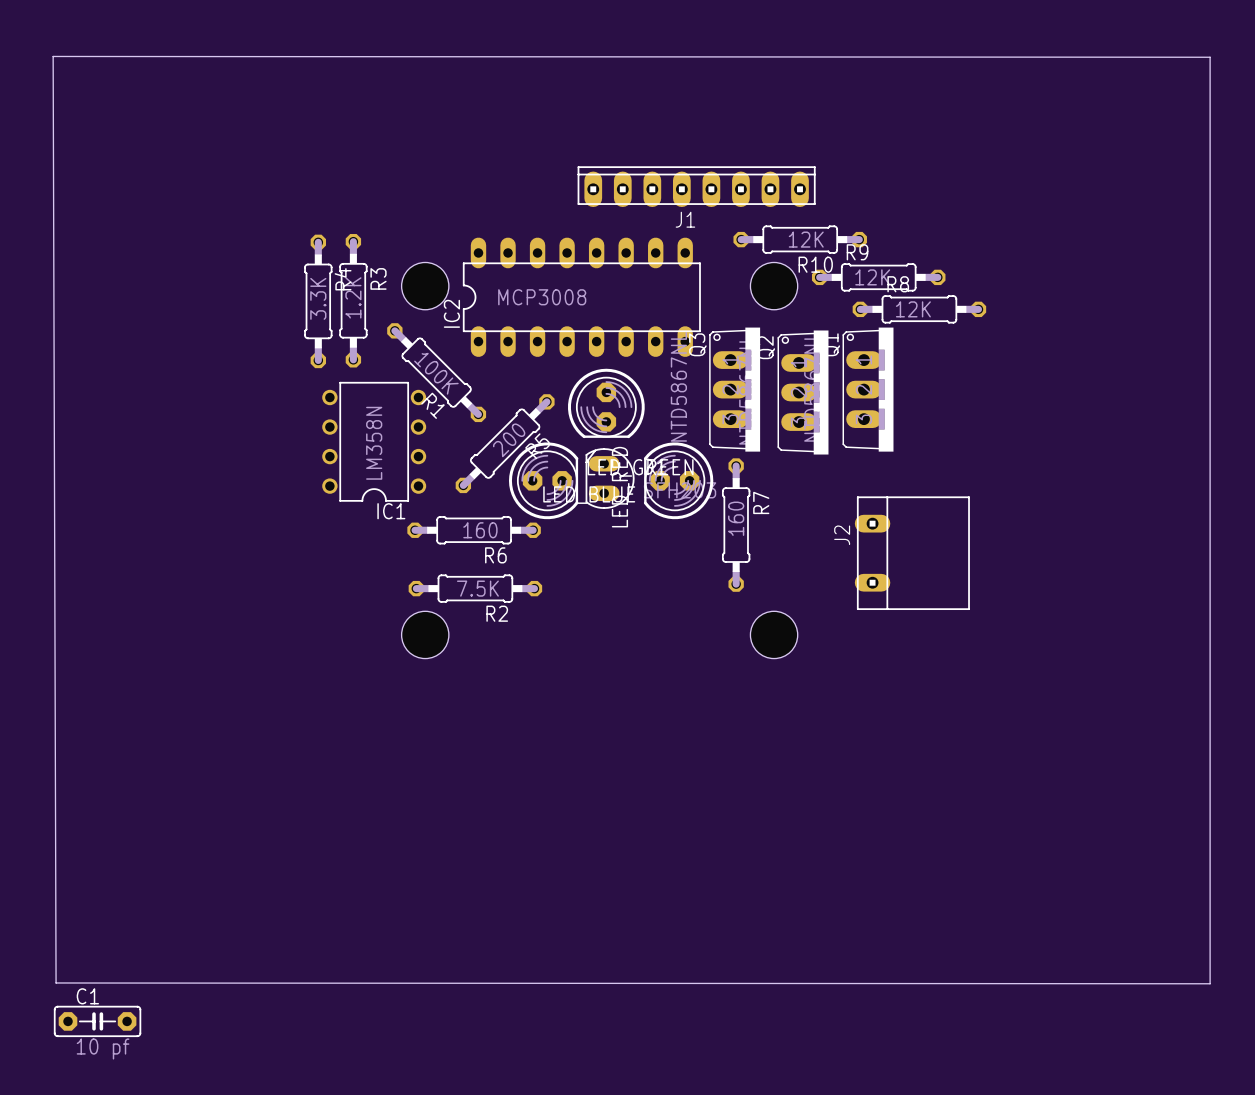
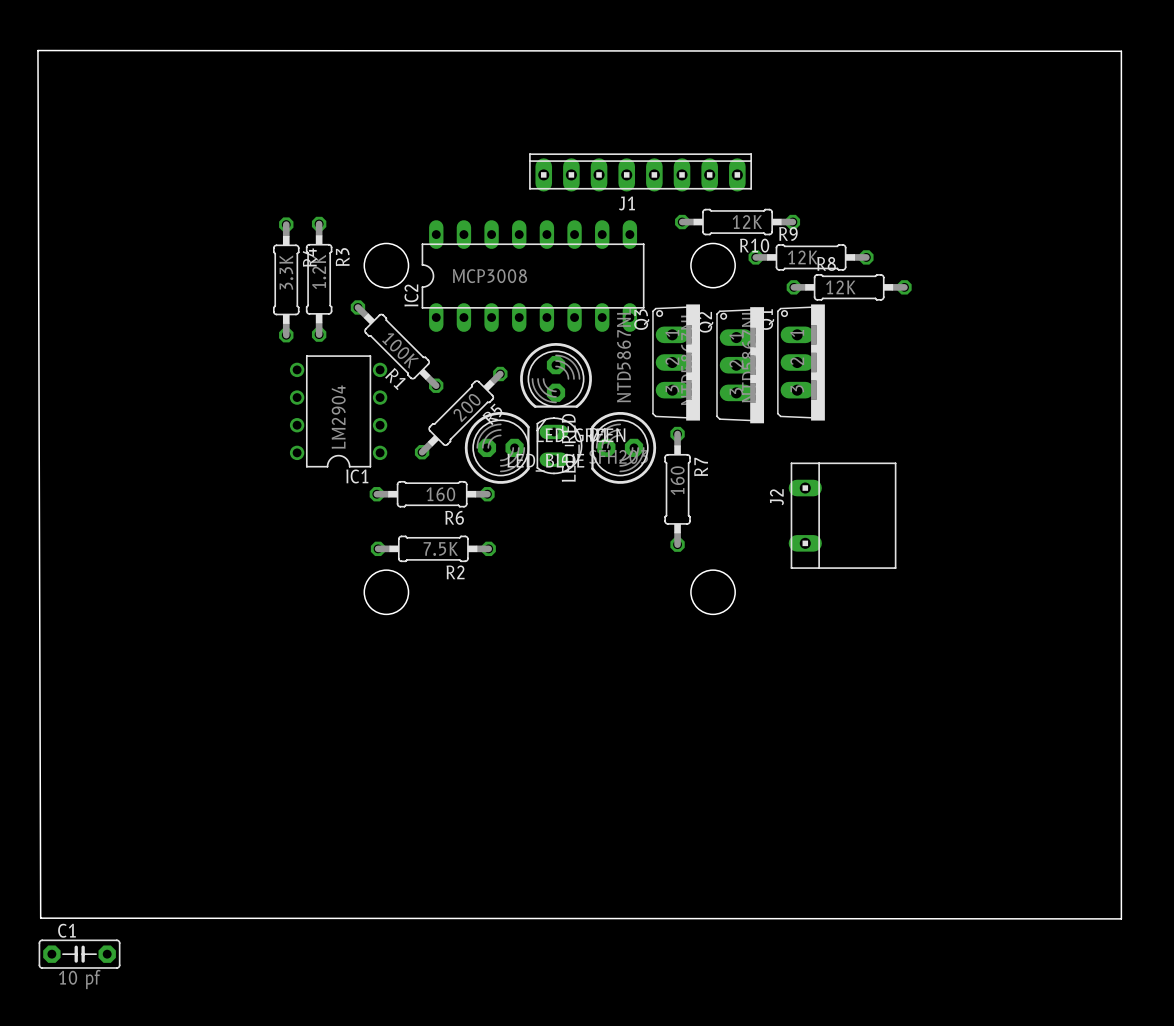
IC1 value: LM358N (374, 443) -> LM2904 (338, 417)

